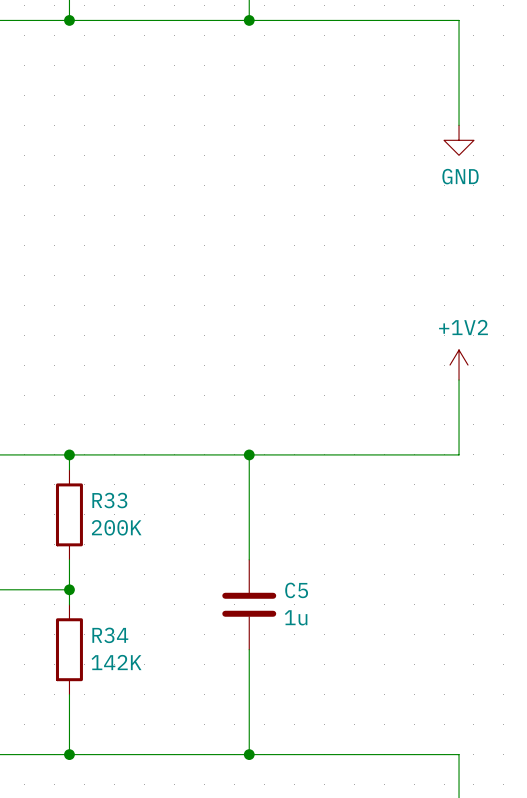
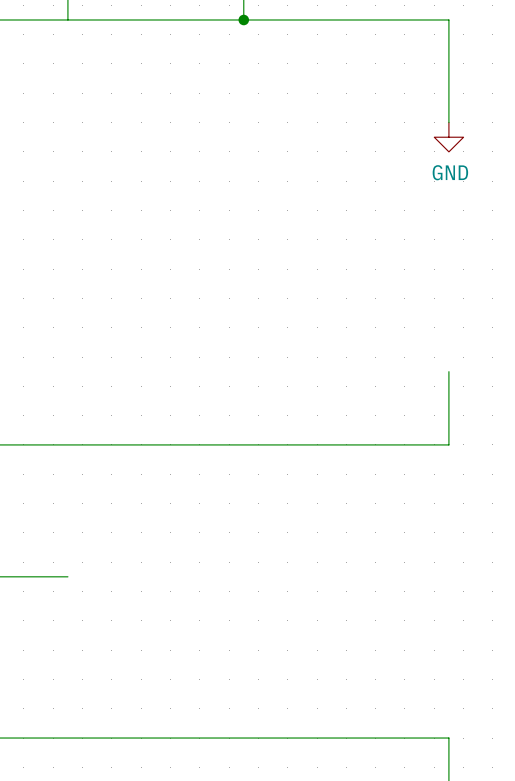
junction: (69, 20) -> none
power symbol: +1V2 (459, 365) -> none
wire: (69, 454) (69, 469) -> none
junction: (69, 454) -> none
wire: (249, 454) (249, 559) -> none
junction: (249, 454) -> none
R33: 200K (69, 514) -> none
wire: (69, 559) (69, 604) -> none
junction: (69, 589) -> none
C5: 1u (249, 604) -> none
R34: 142K (69, 649) -> none
wire: (249, 649) (249, 754) -> none
wire: (69, 694) (69, 754) -> none
junction: (69, 754) -> none
junction: (249, 754) -> none

